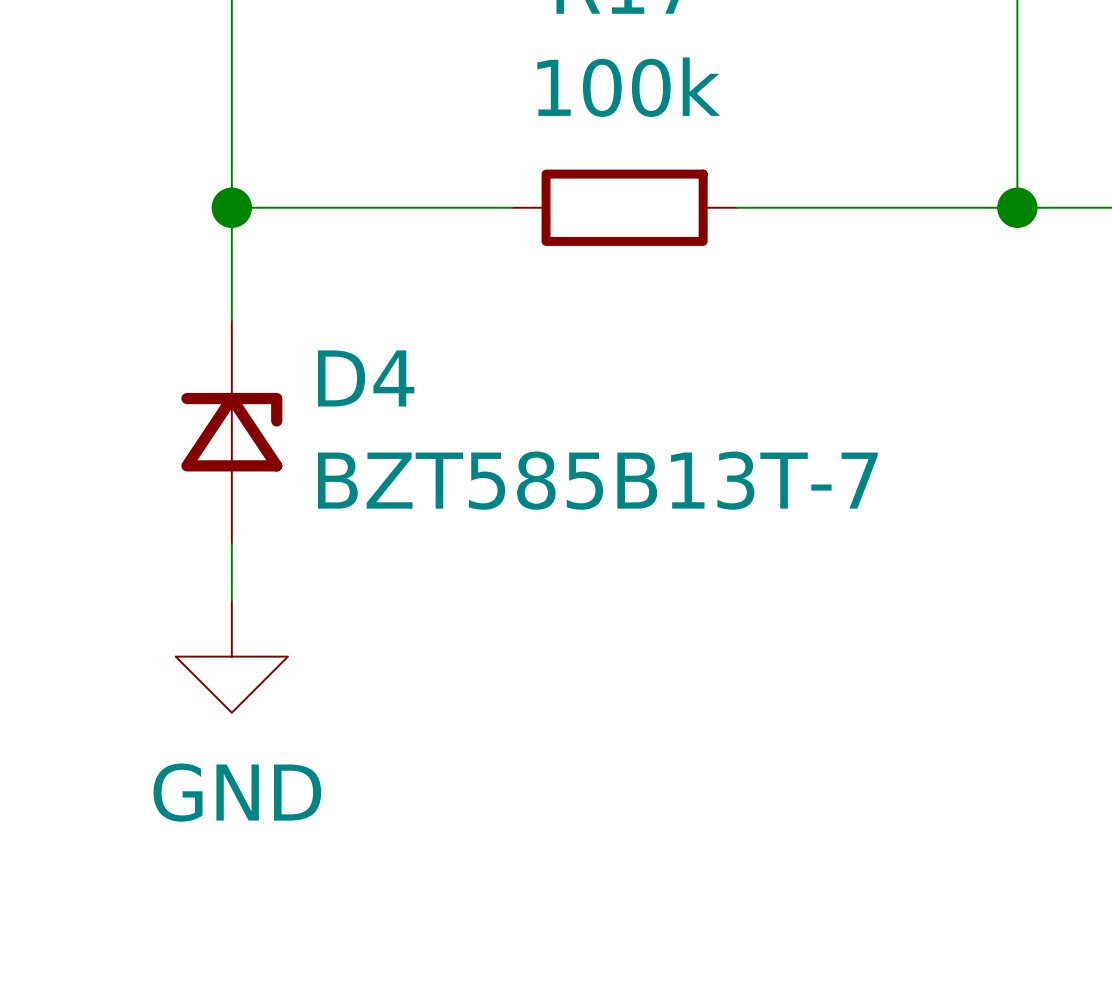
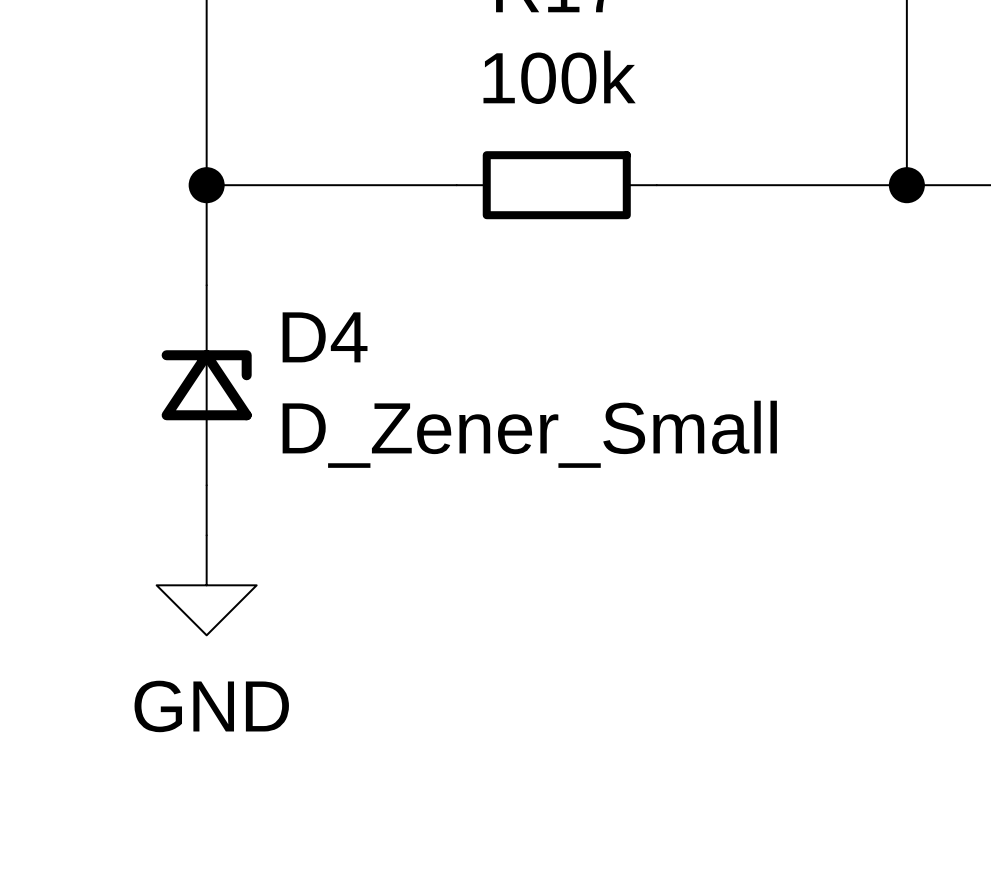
D4 value: BZT585B13T-7 (597, 480) -> D_Zener_Small (529, 434)

